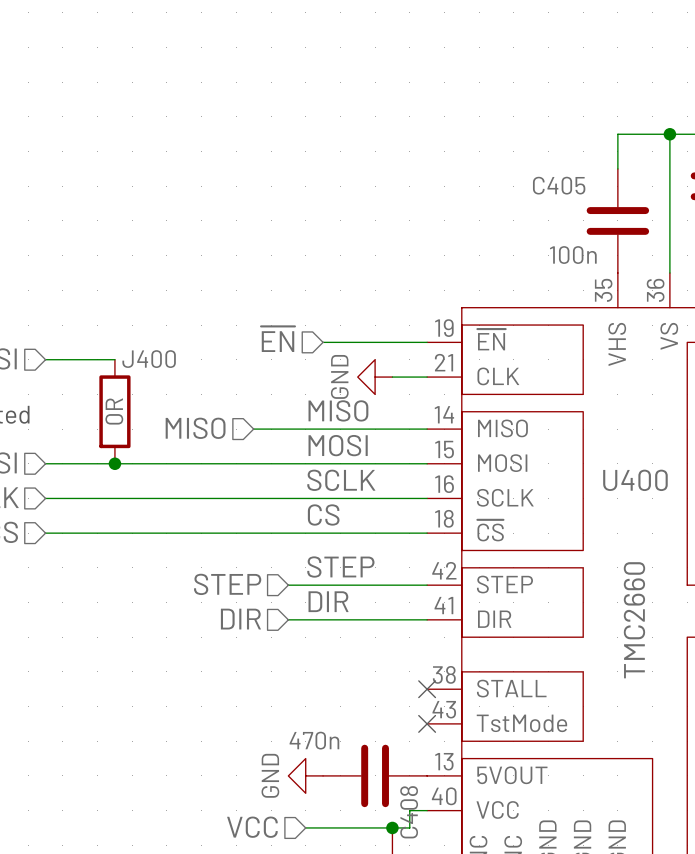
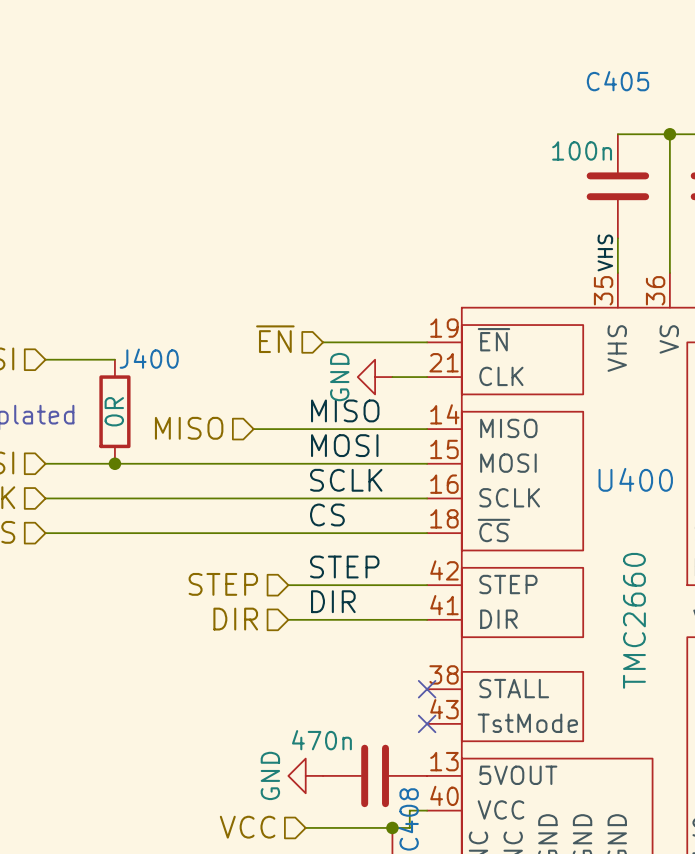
C405 name position: C405 (559, 185) -> C405 (618, 81)
C405 position: (617, 220) -> (617, 186)
C405 value position: 100n (573, 255) -> 100n (582, 150)
label: none -> VHS (605, 252)

